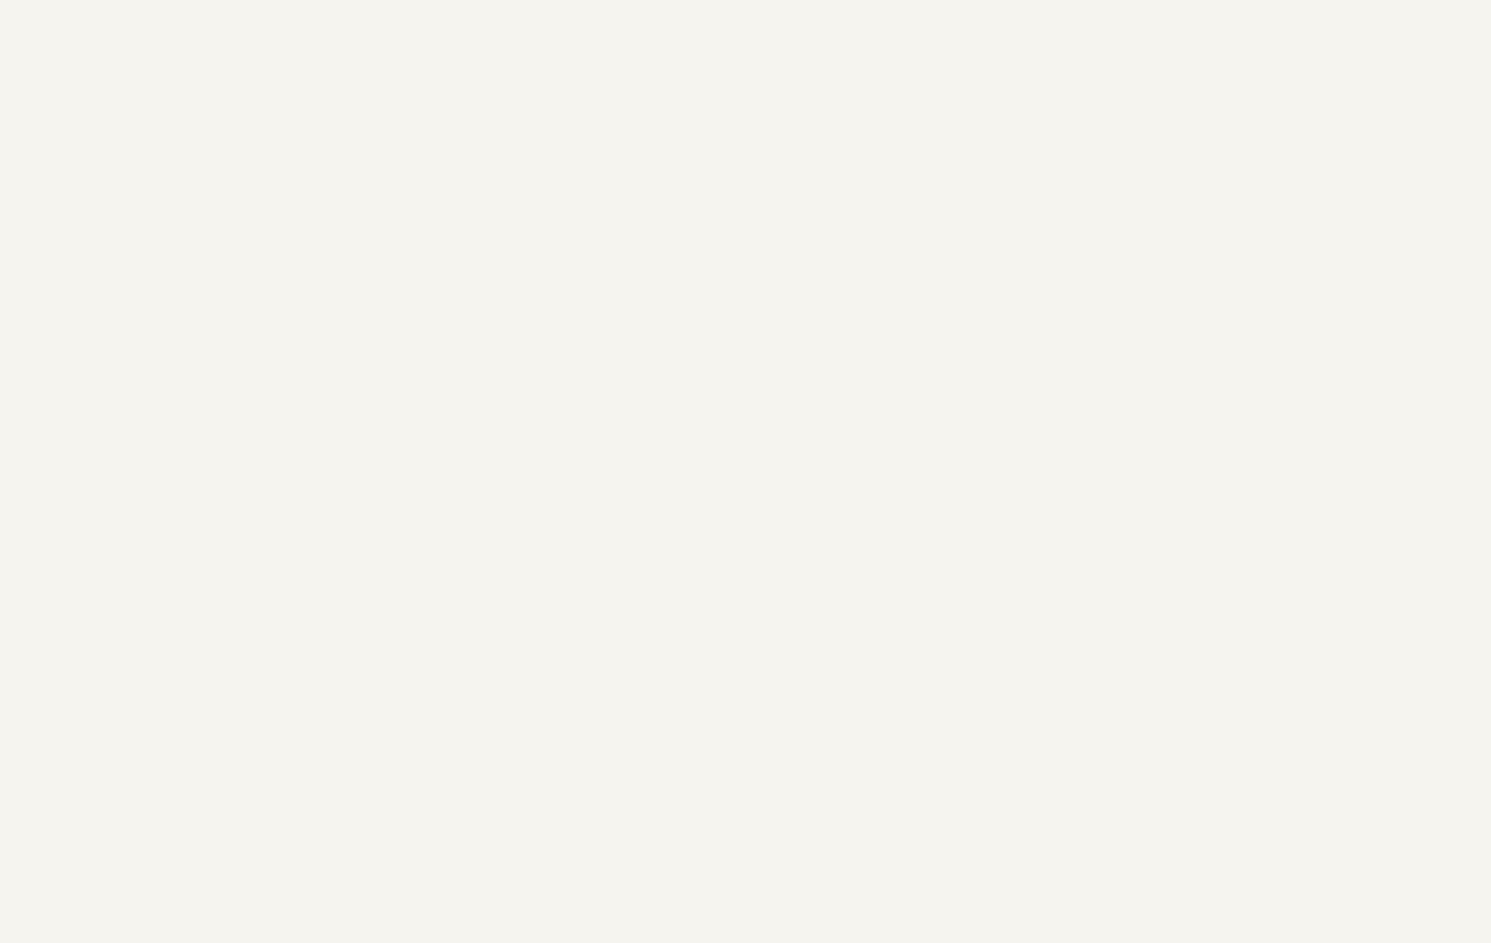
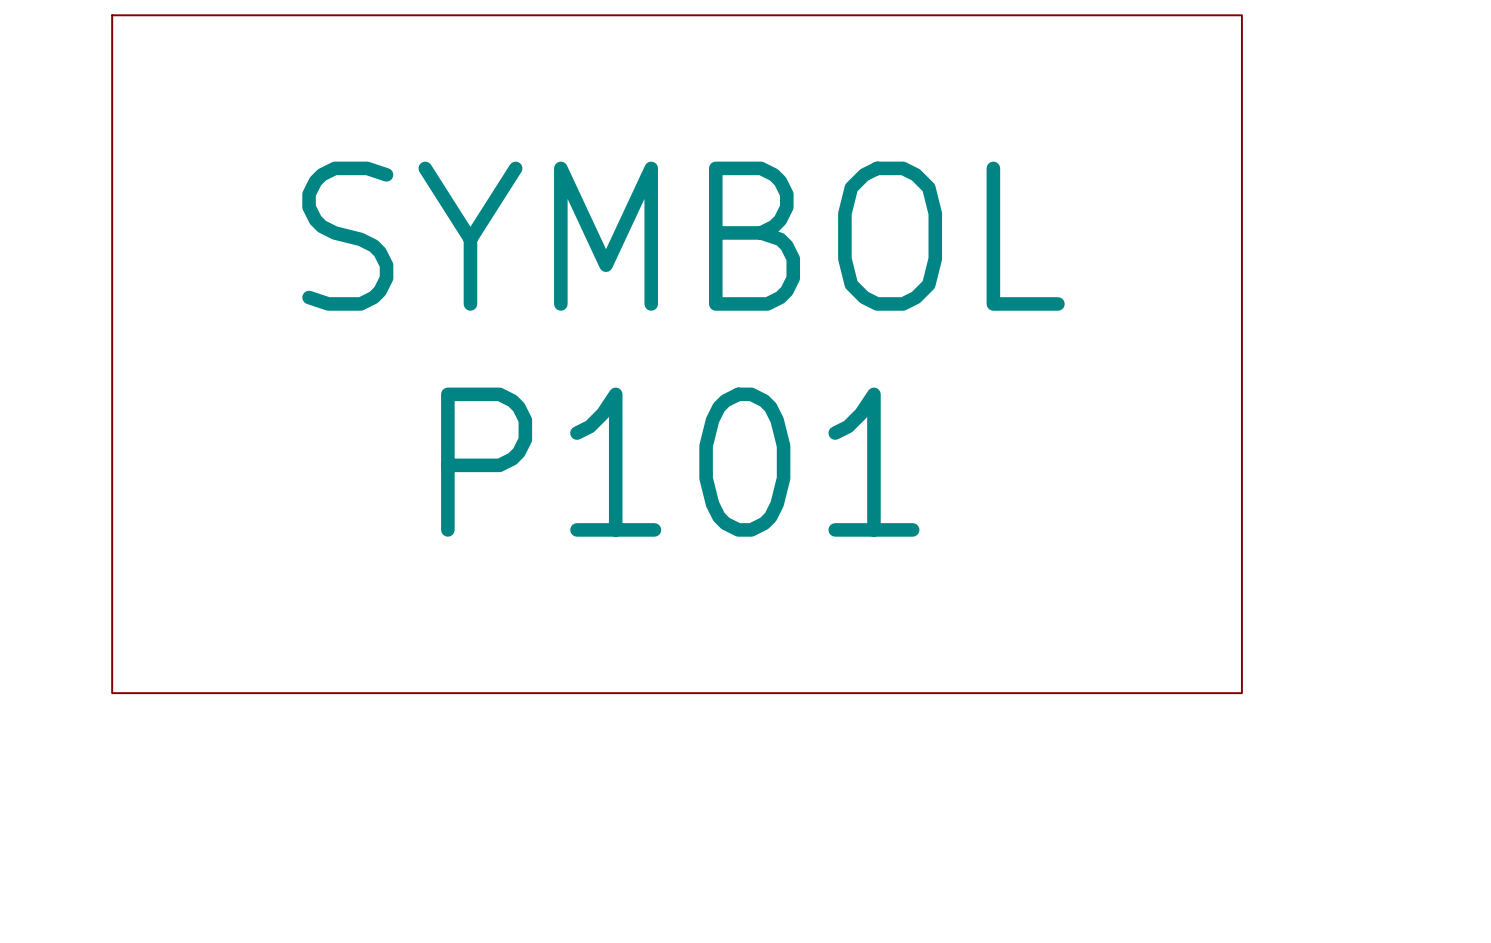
P101: none -> SYMBOL (677, 354)

